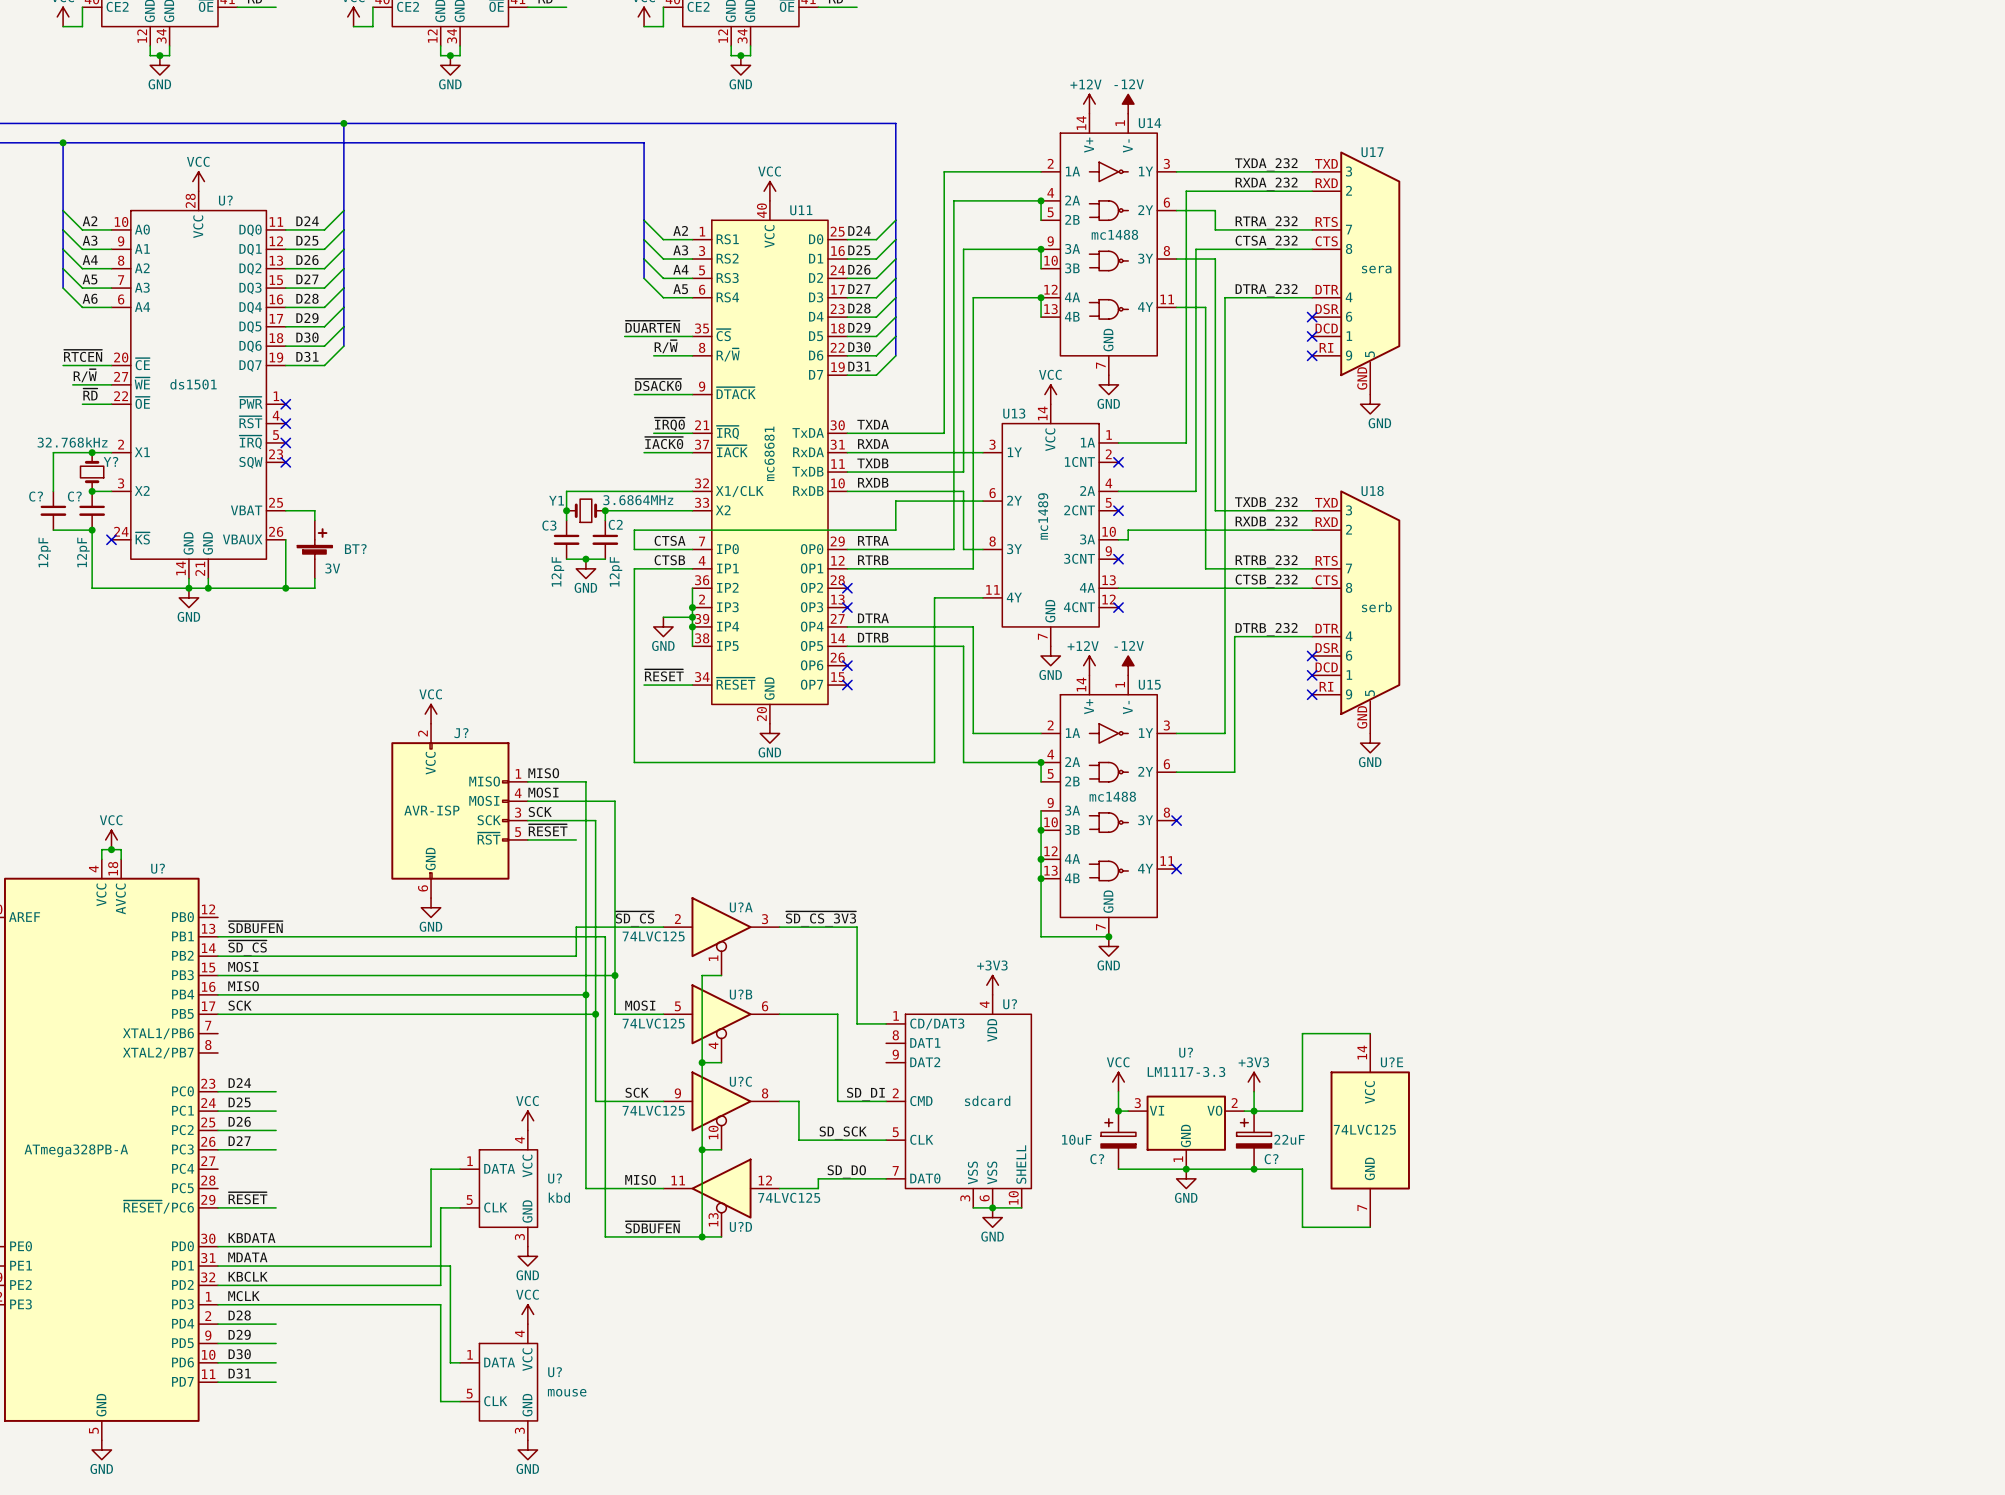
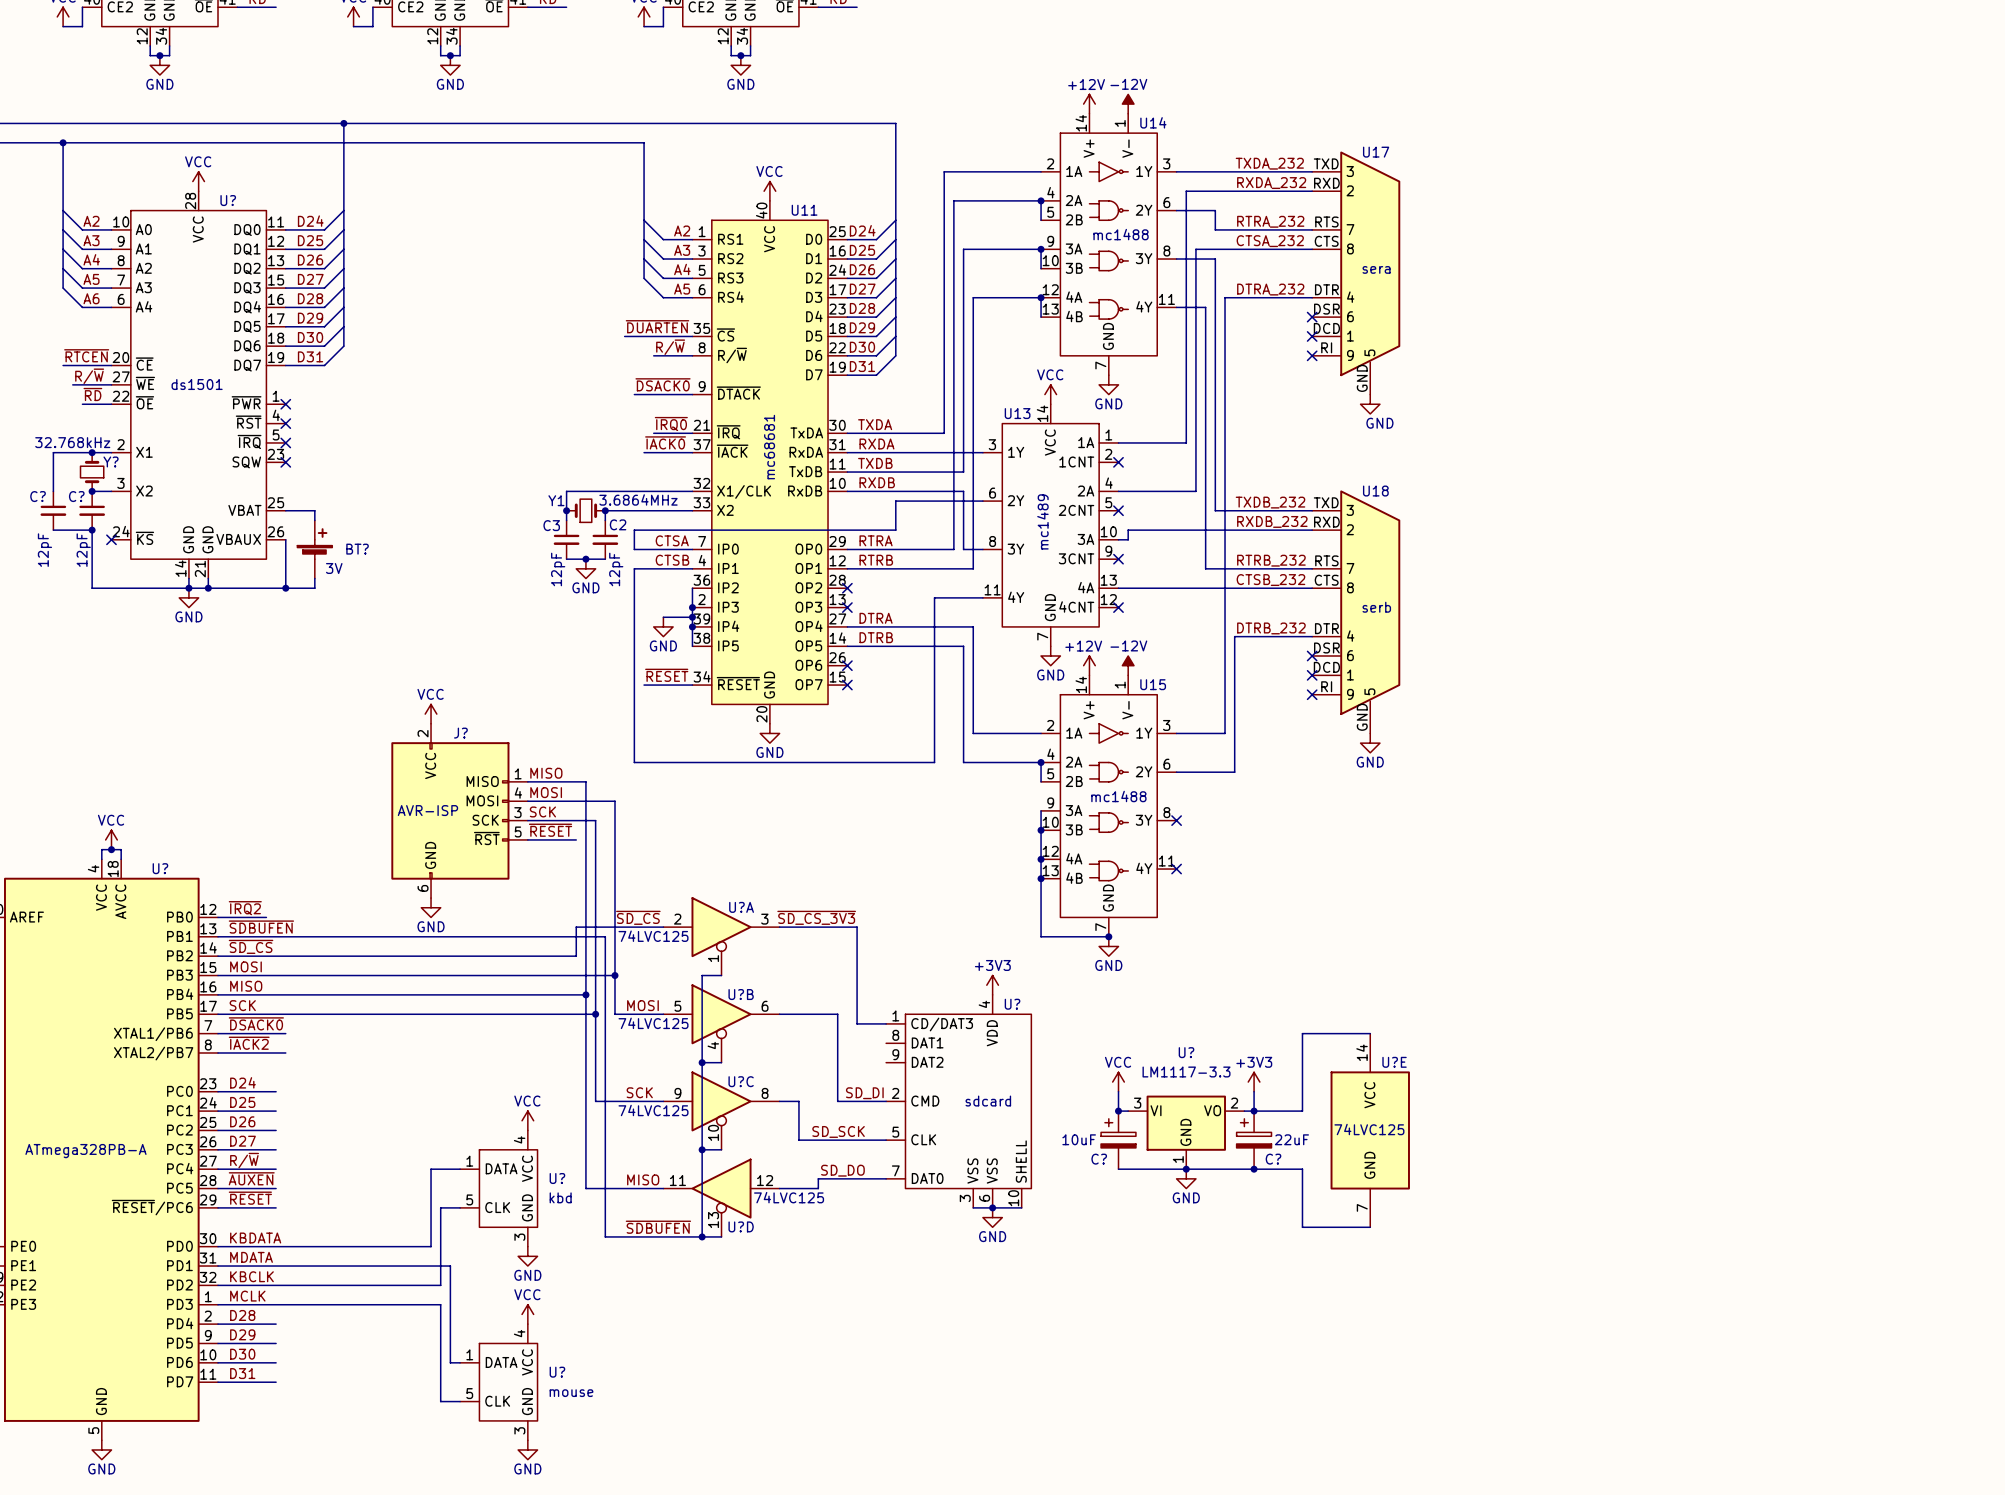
label: none -> ~{IRQ2} (245, 908)
wire: none -> (218, 917) (266, 917)
label: none -> ~{DSACK0} (256, 1023)
wire: none -> (218, 1033) (285, 1033)
label: none -> ~{IACK2} (249, 1043)
wire: none -> (218, 1052) (285, 1052)
label: none -> R/~{W} (244, 1160)
wire: none -> (218, 1169) (276, 1169)
label: none -> ~{AUXEN} (251, 1178)
wire: none -> (218, 1188) (276, 1188)

